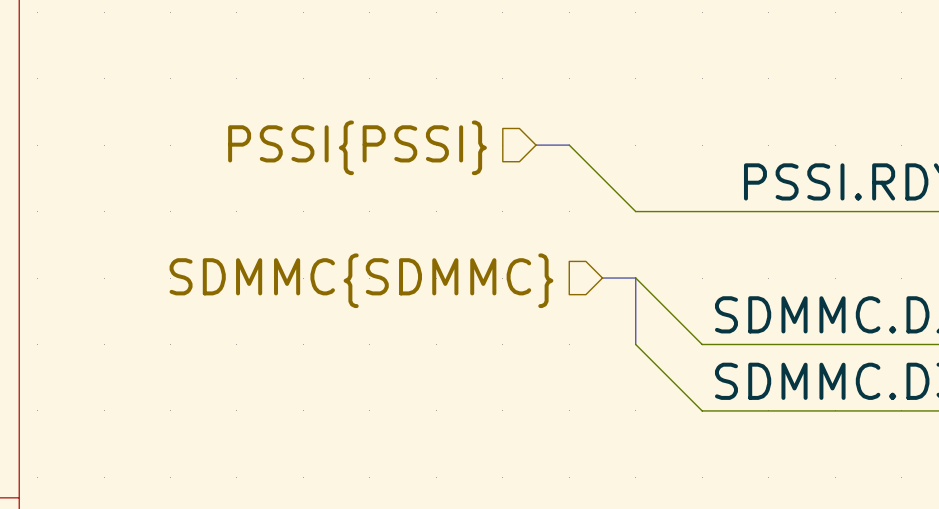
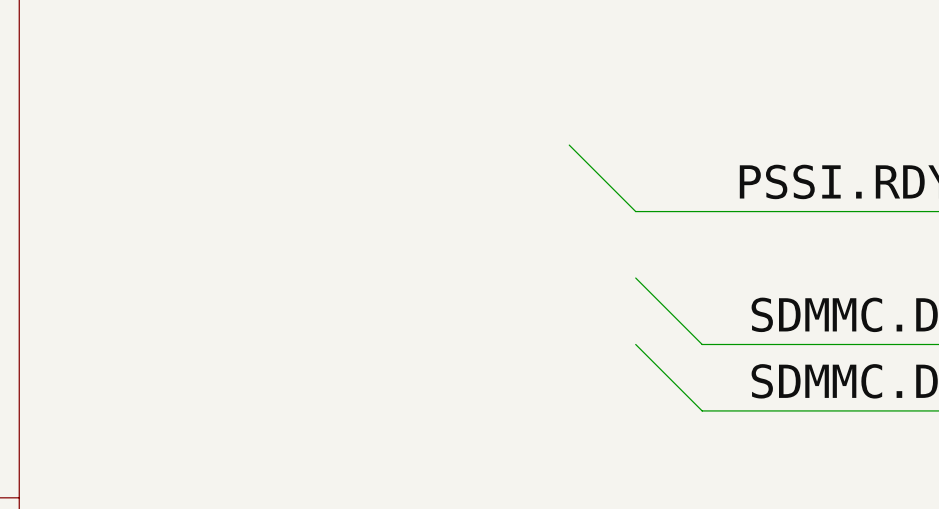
bus: (536, 145) (569, 145) -> none
hierarchical label: PSSI{PSSI} (357, 147) -> none
bus: (602, 278) (635, 278) (635, 344) -> none
hierarchical label: SDMMC{SDMMC} (361, 280) -> none

